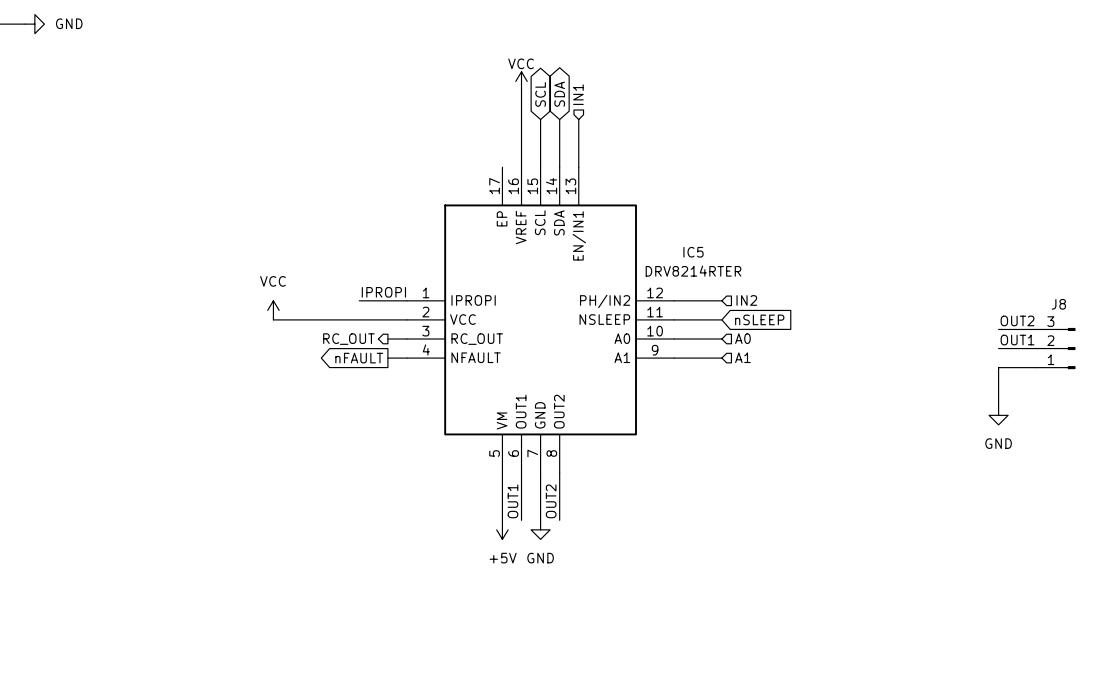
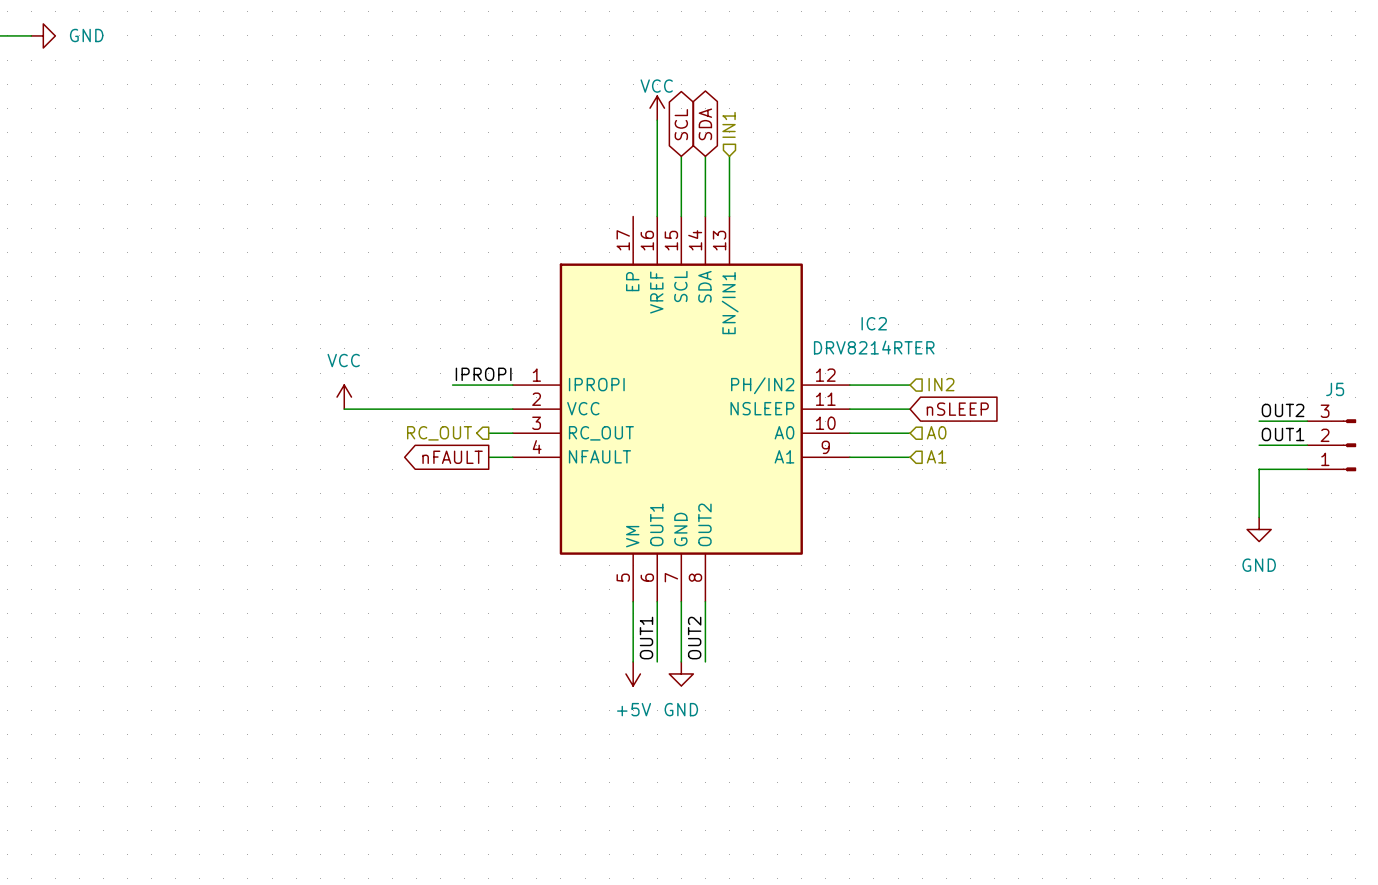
IC5 name: IC5 (693, 252) -> IC2 (874, 323)
J8 name: J8 (1058, 304) -> J5 (1335, 389)

